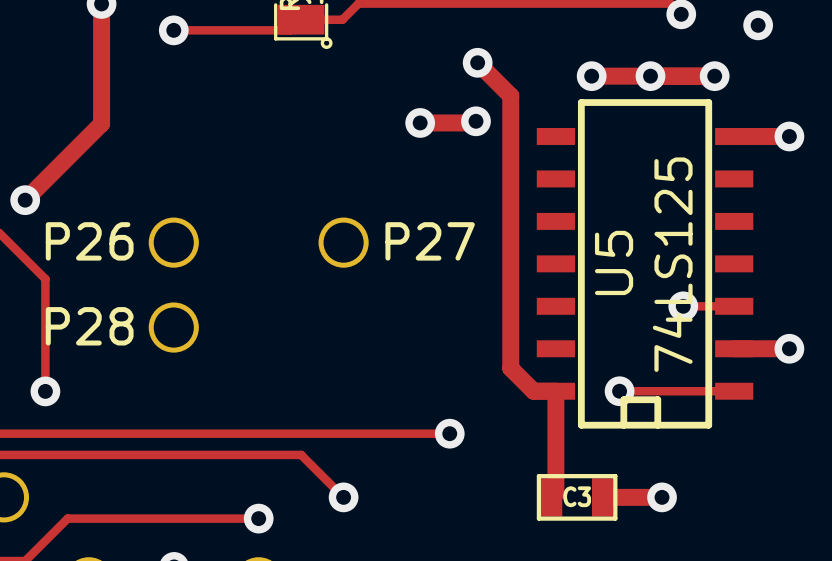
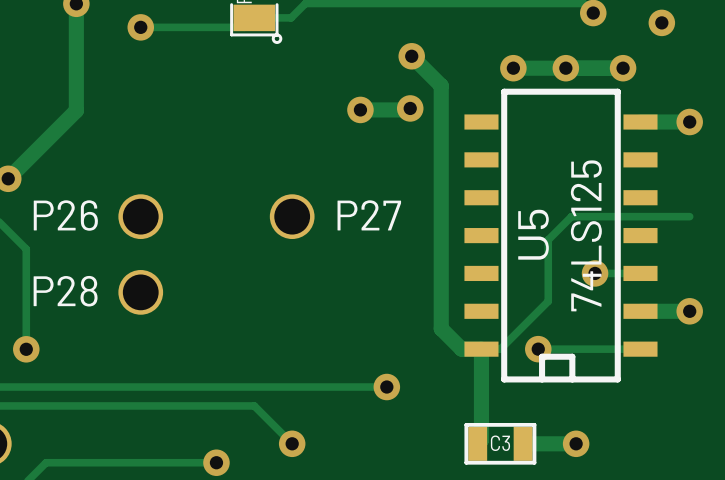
track: none -> (689, 216) (571, 216) (548, 239) (548, 301) (500, 349) (481, 349)

